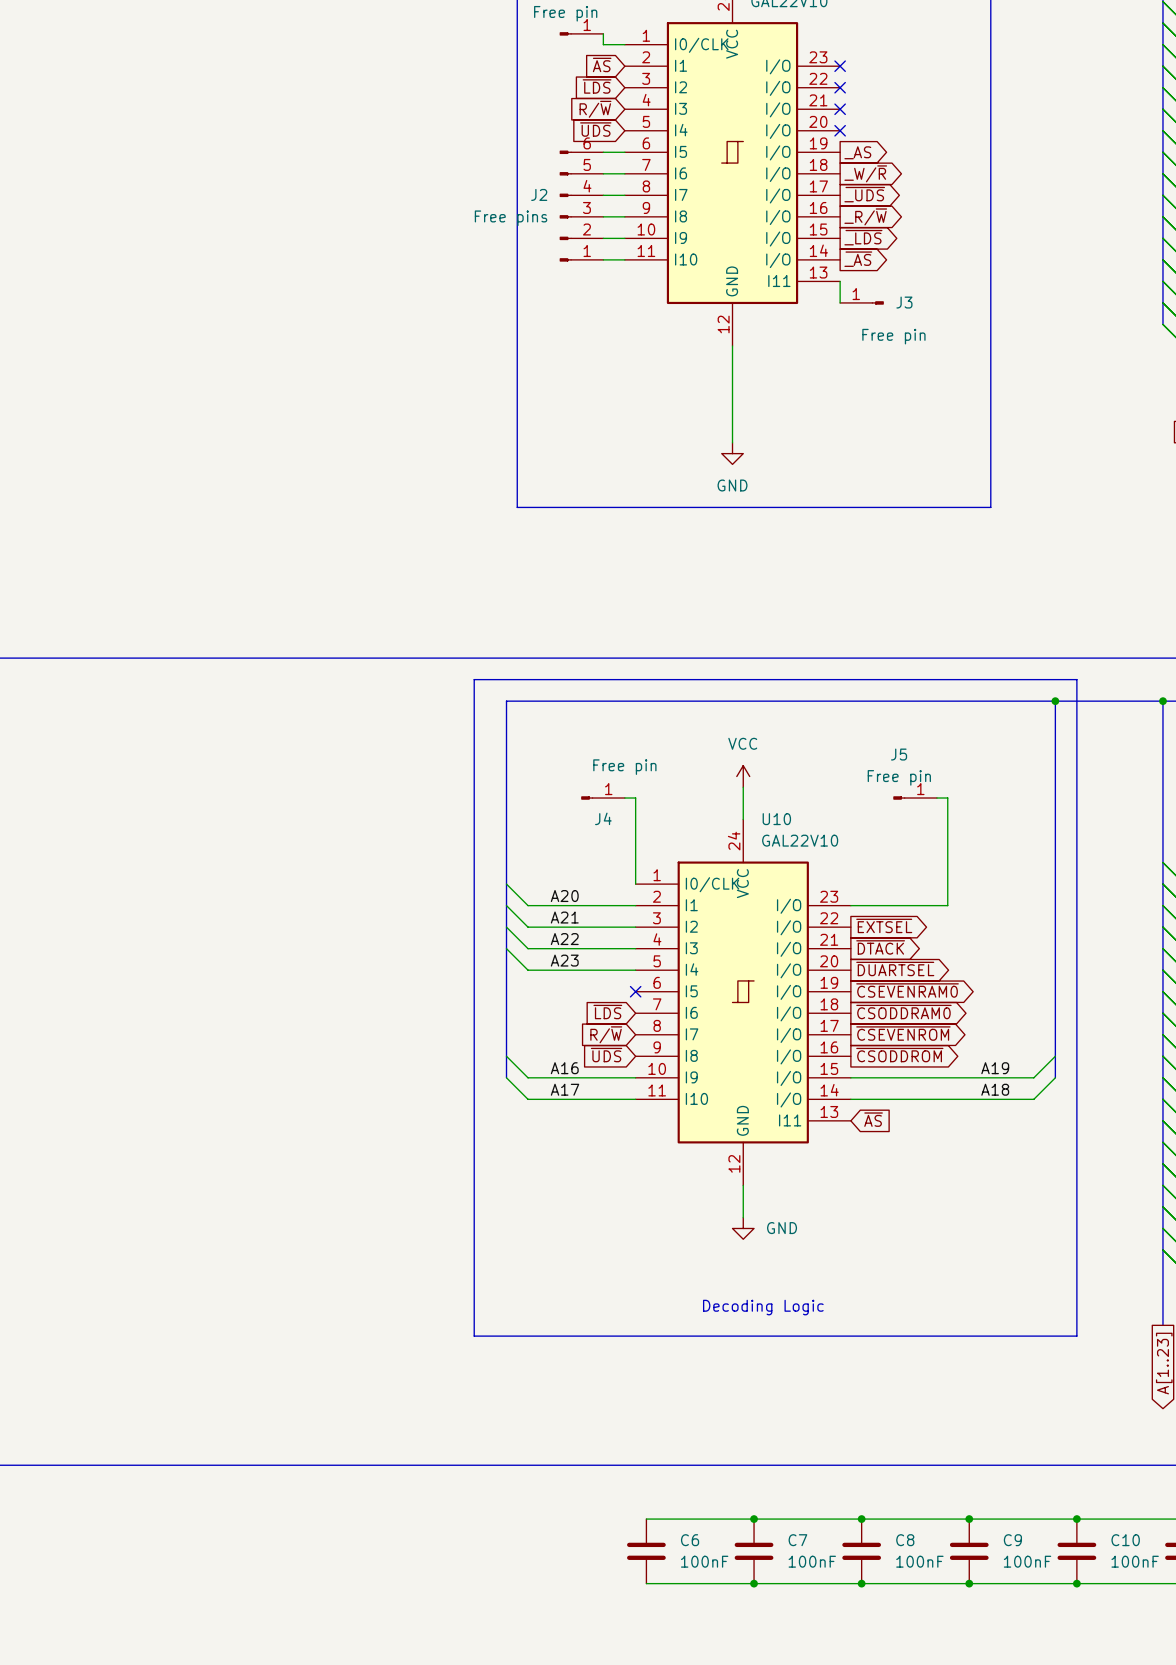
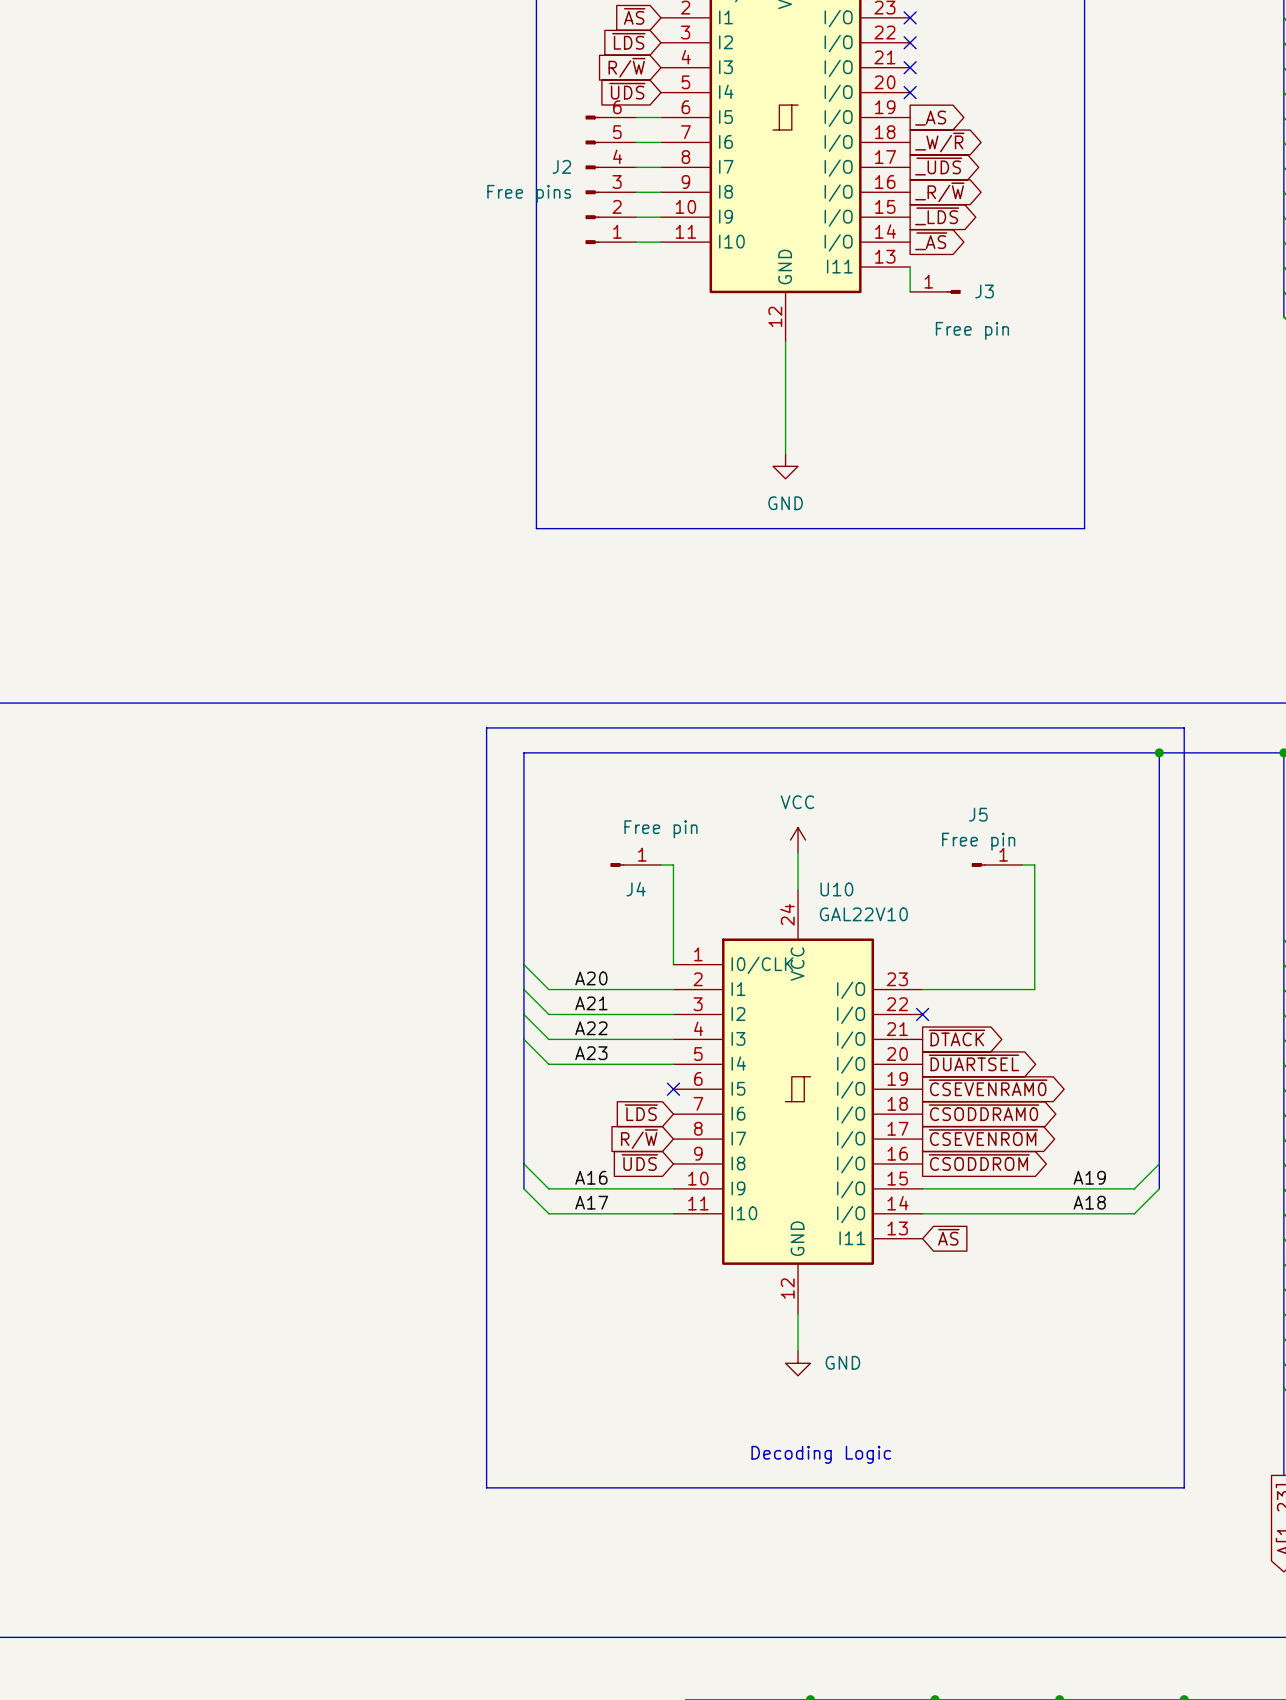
global label: ~{EXTSEL} (884, 925) -> none
no-connect mark: none -> (922, 1014)

